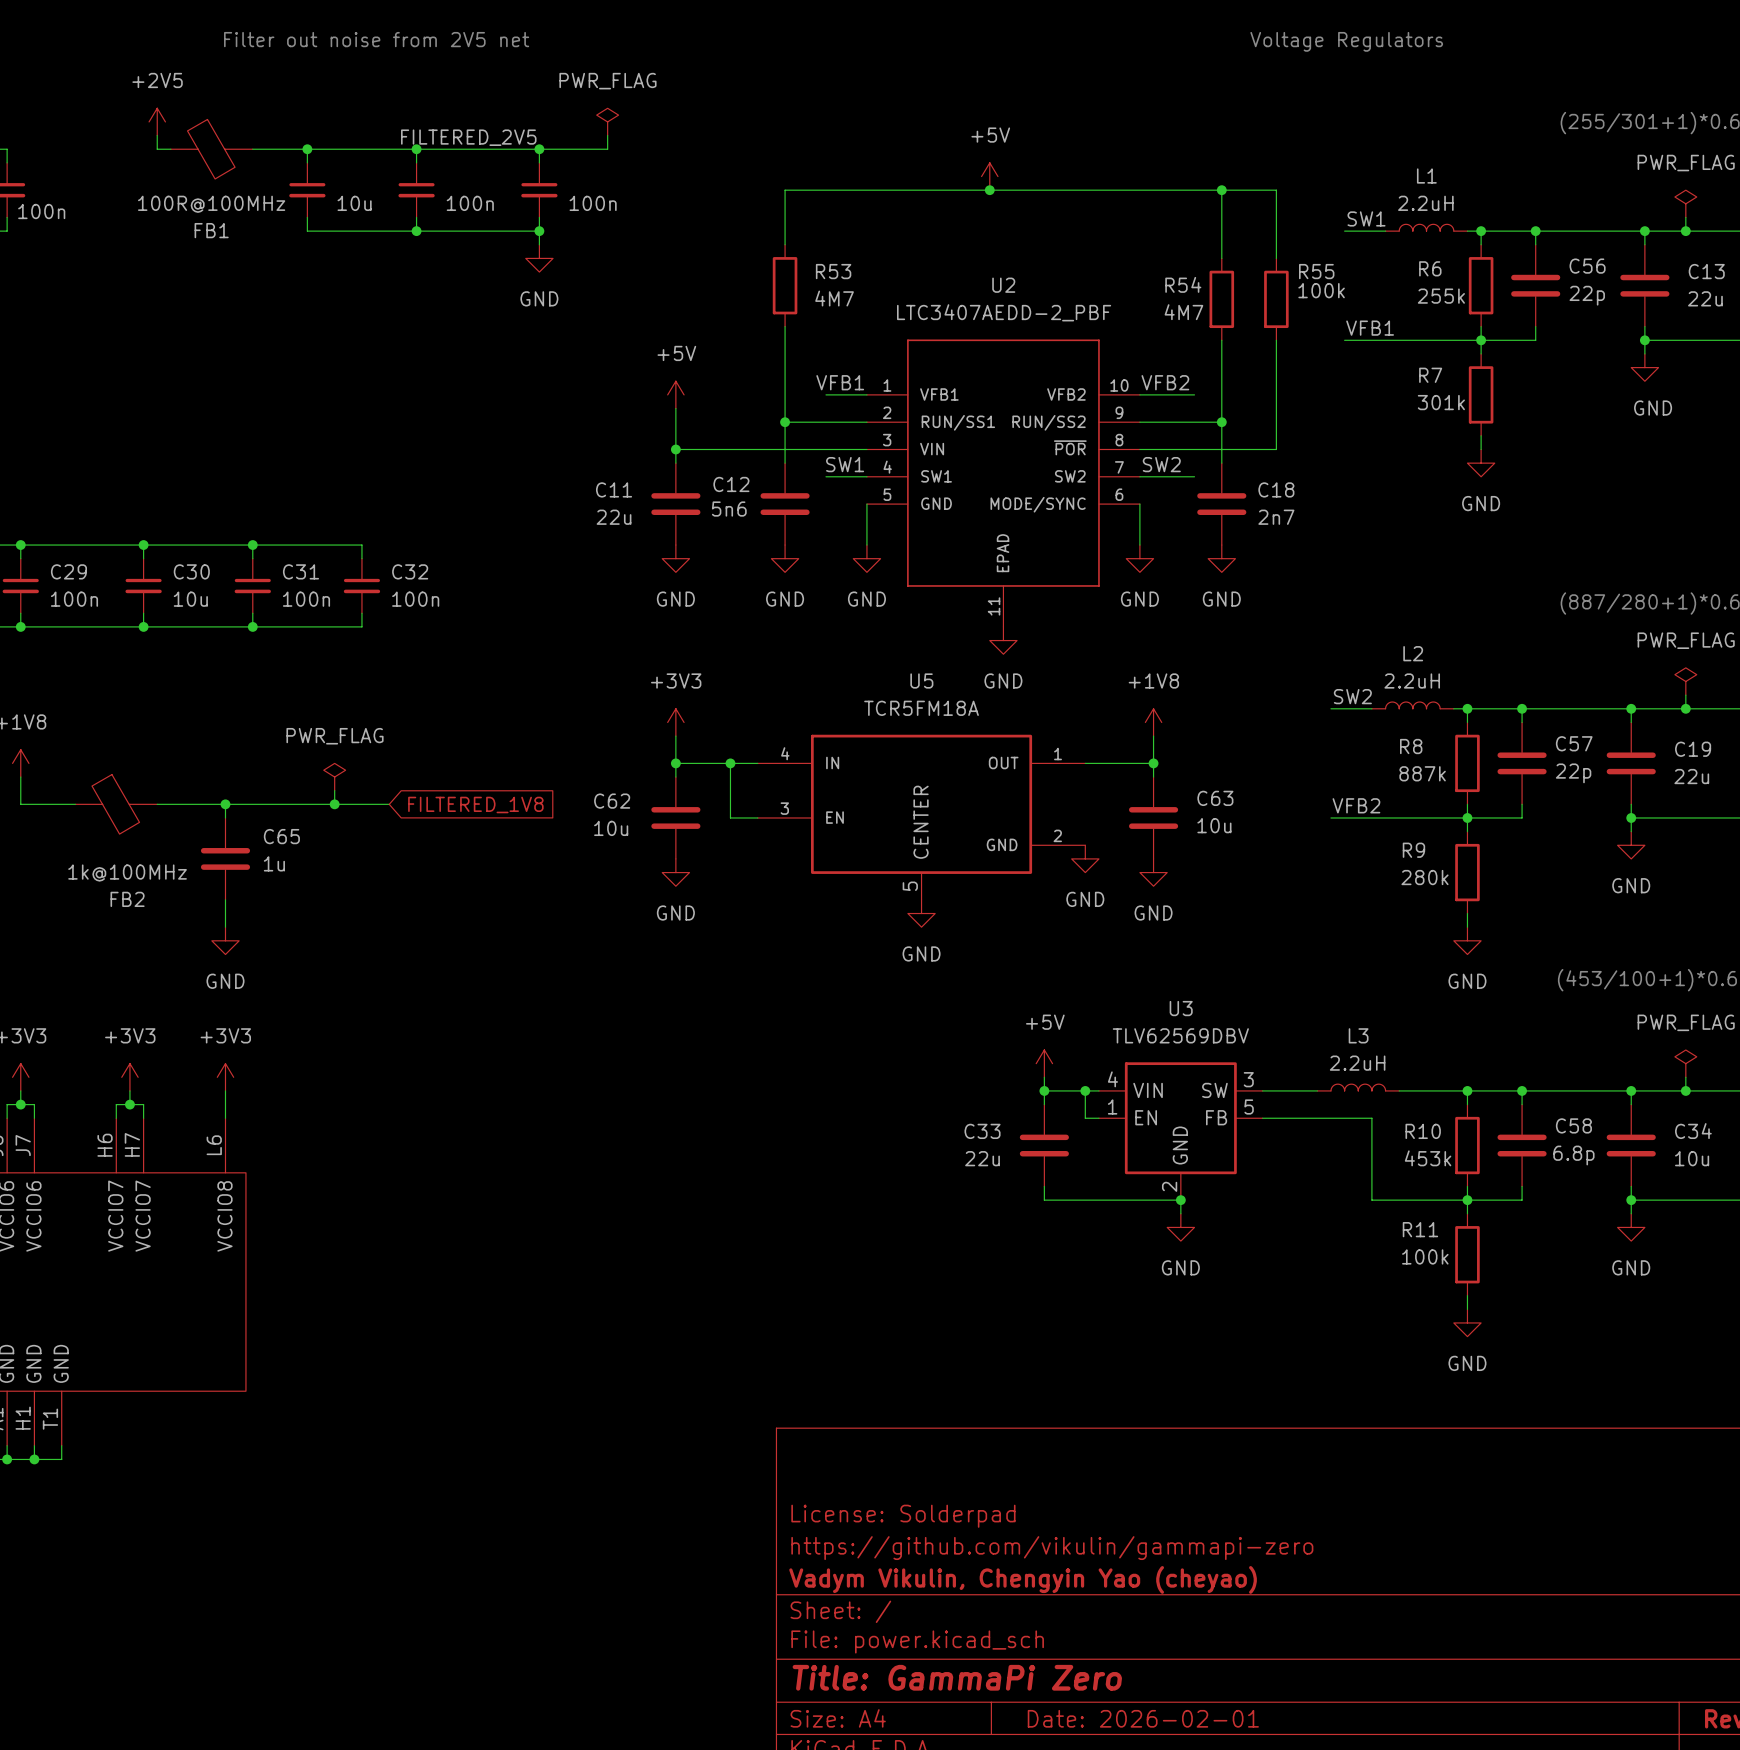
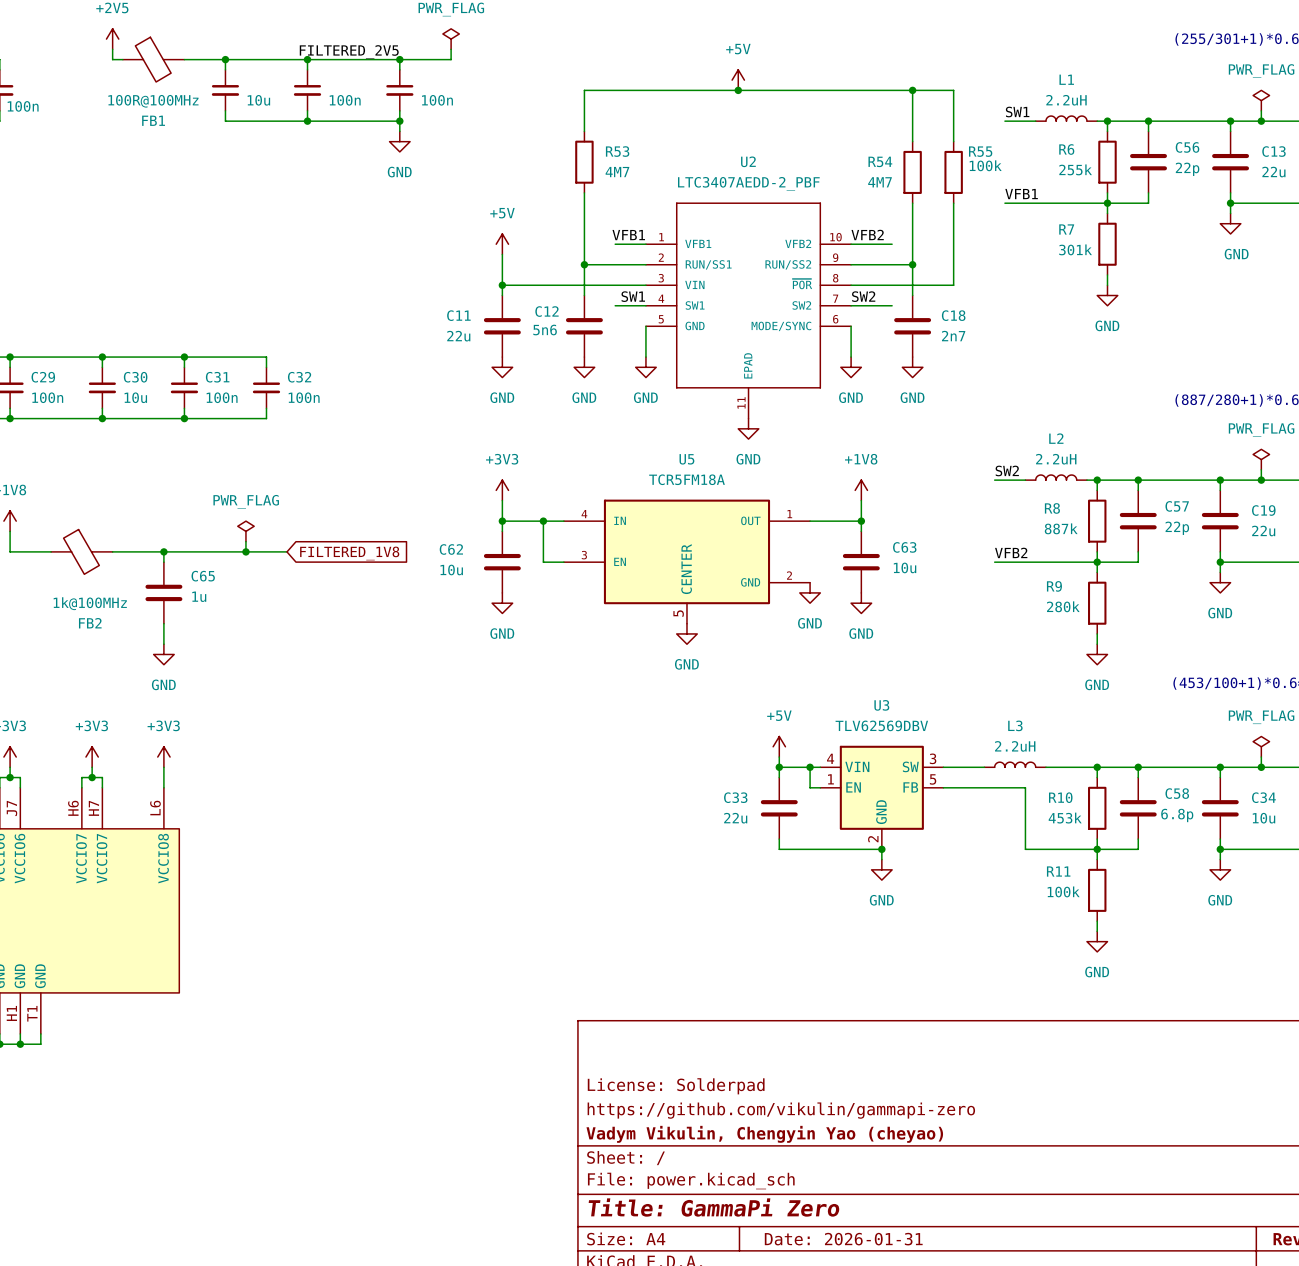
title block: Date: 2026-02-01 (1143, 1718) -> Date: 2026-01-31 (843, 1239)

